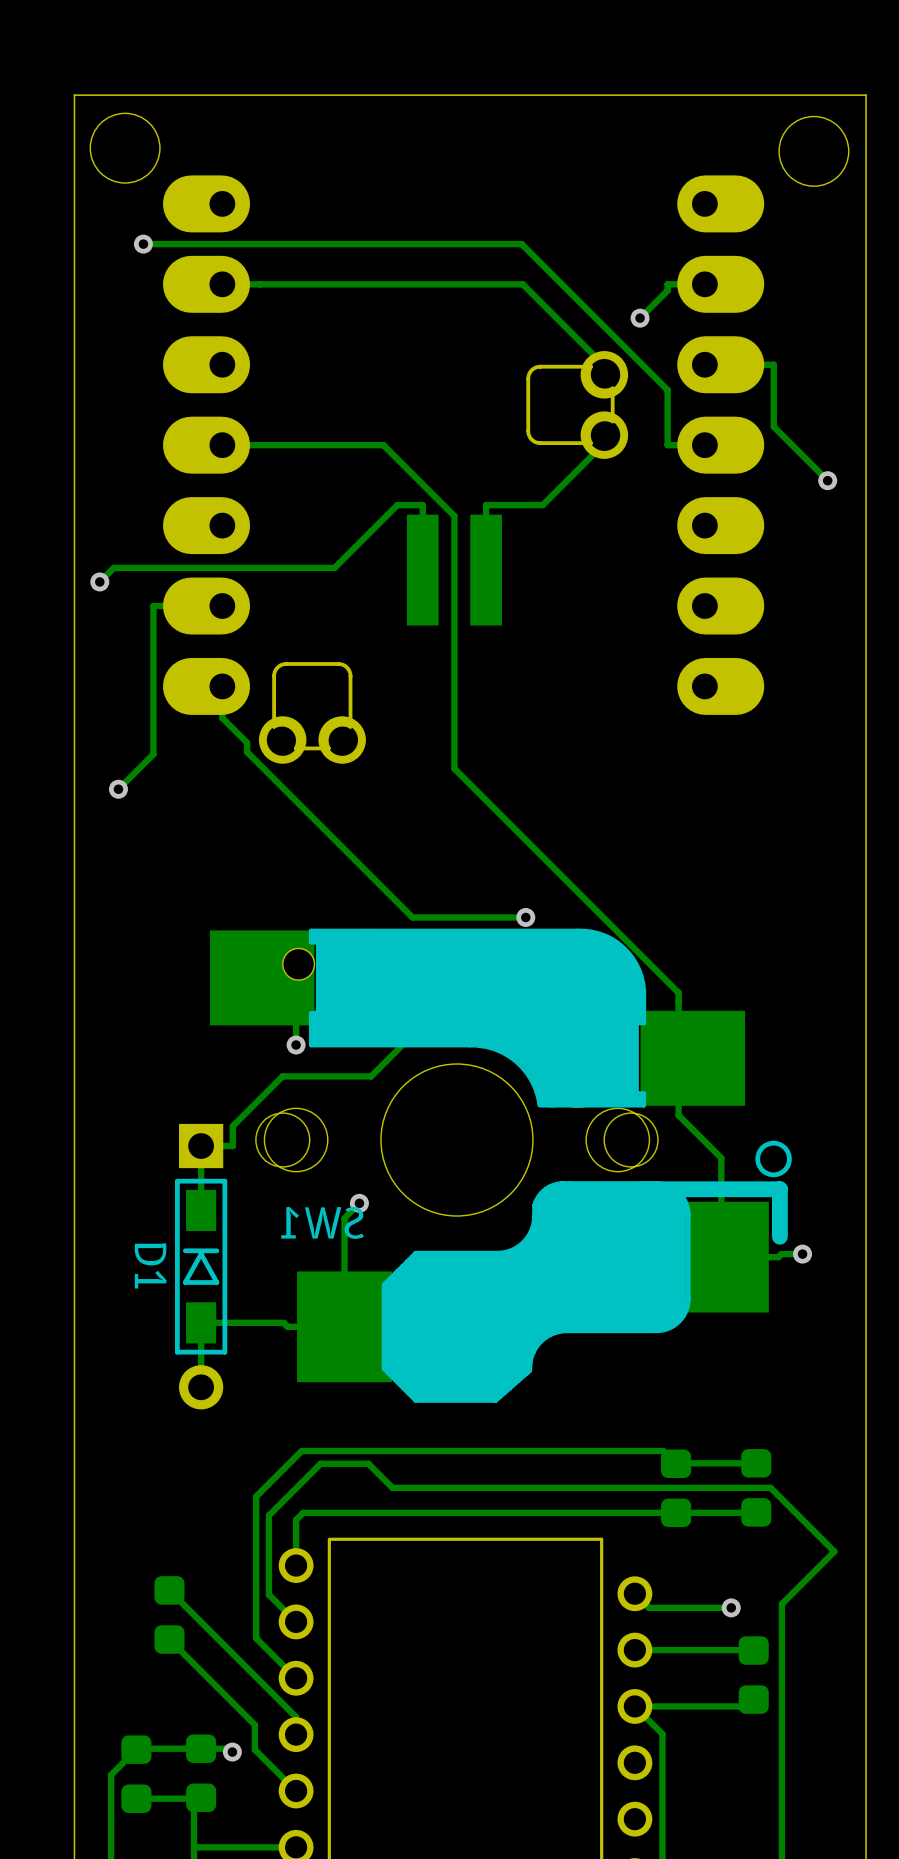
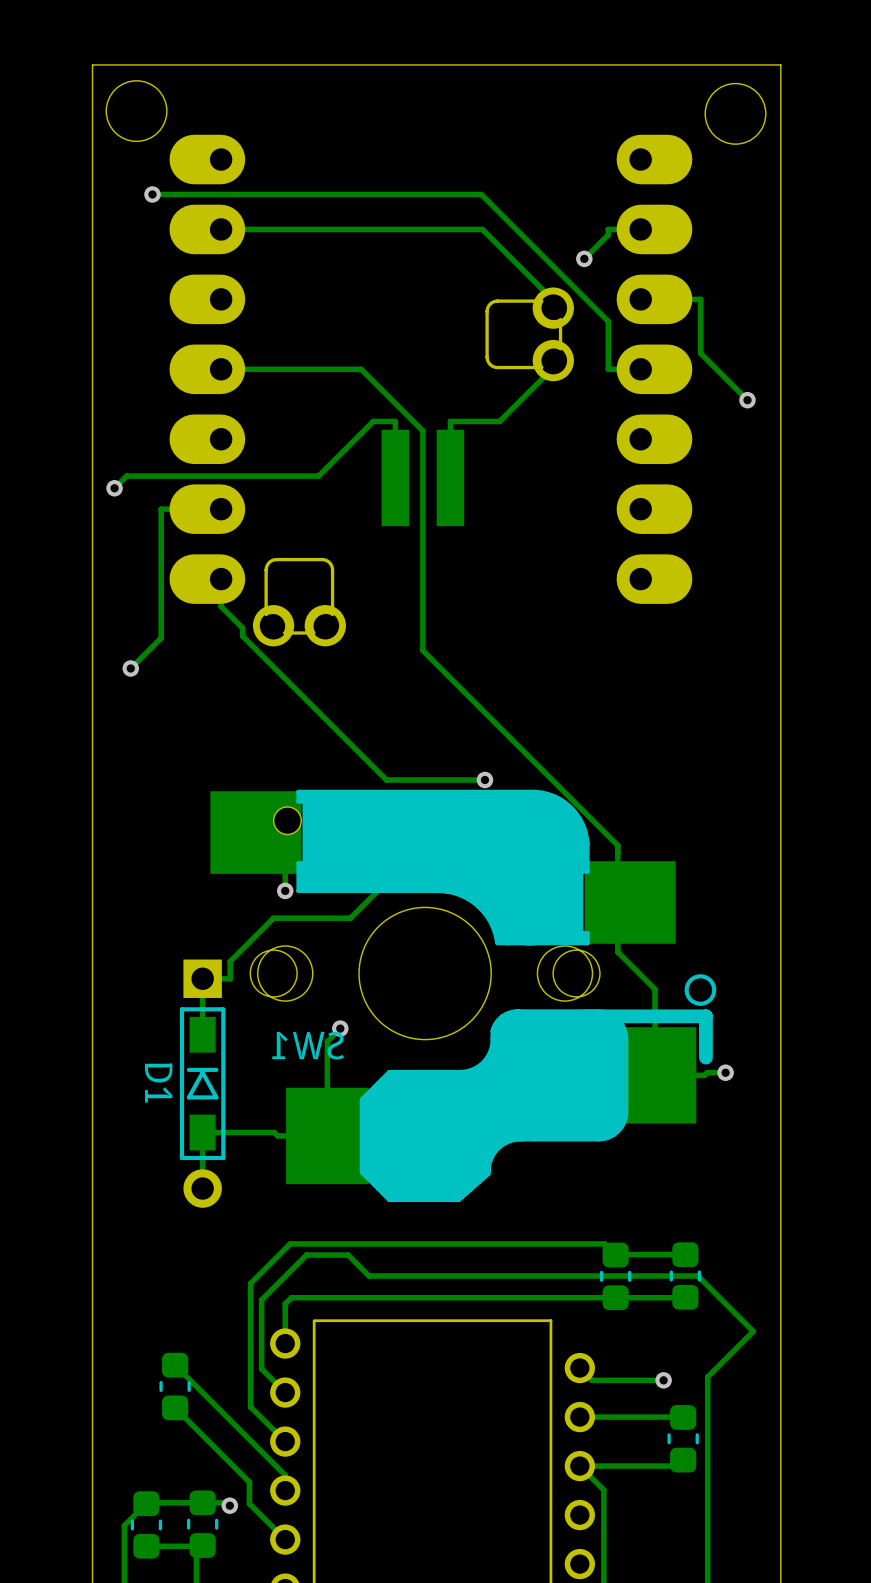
part side: top (756, 1487) -> bottom (685, 1275)
part side: top (676, 1488) -> bottom (615, 1276)
part side: top (169, 1614) -> bottom (175, 1386)
part side: top (753, 1675) -> bottom (683, 1438)
part side: top (201, 1773) -> bottom (202, 1524)
part side: top (136, 1774) -> bottom (146, 1524)

